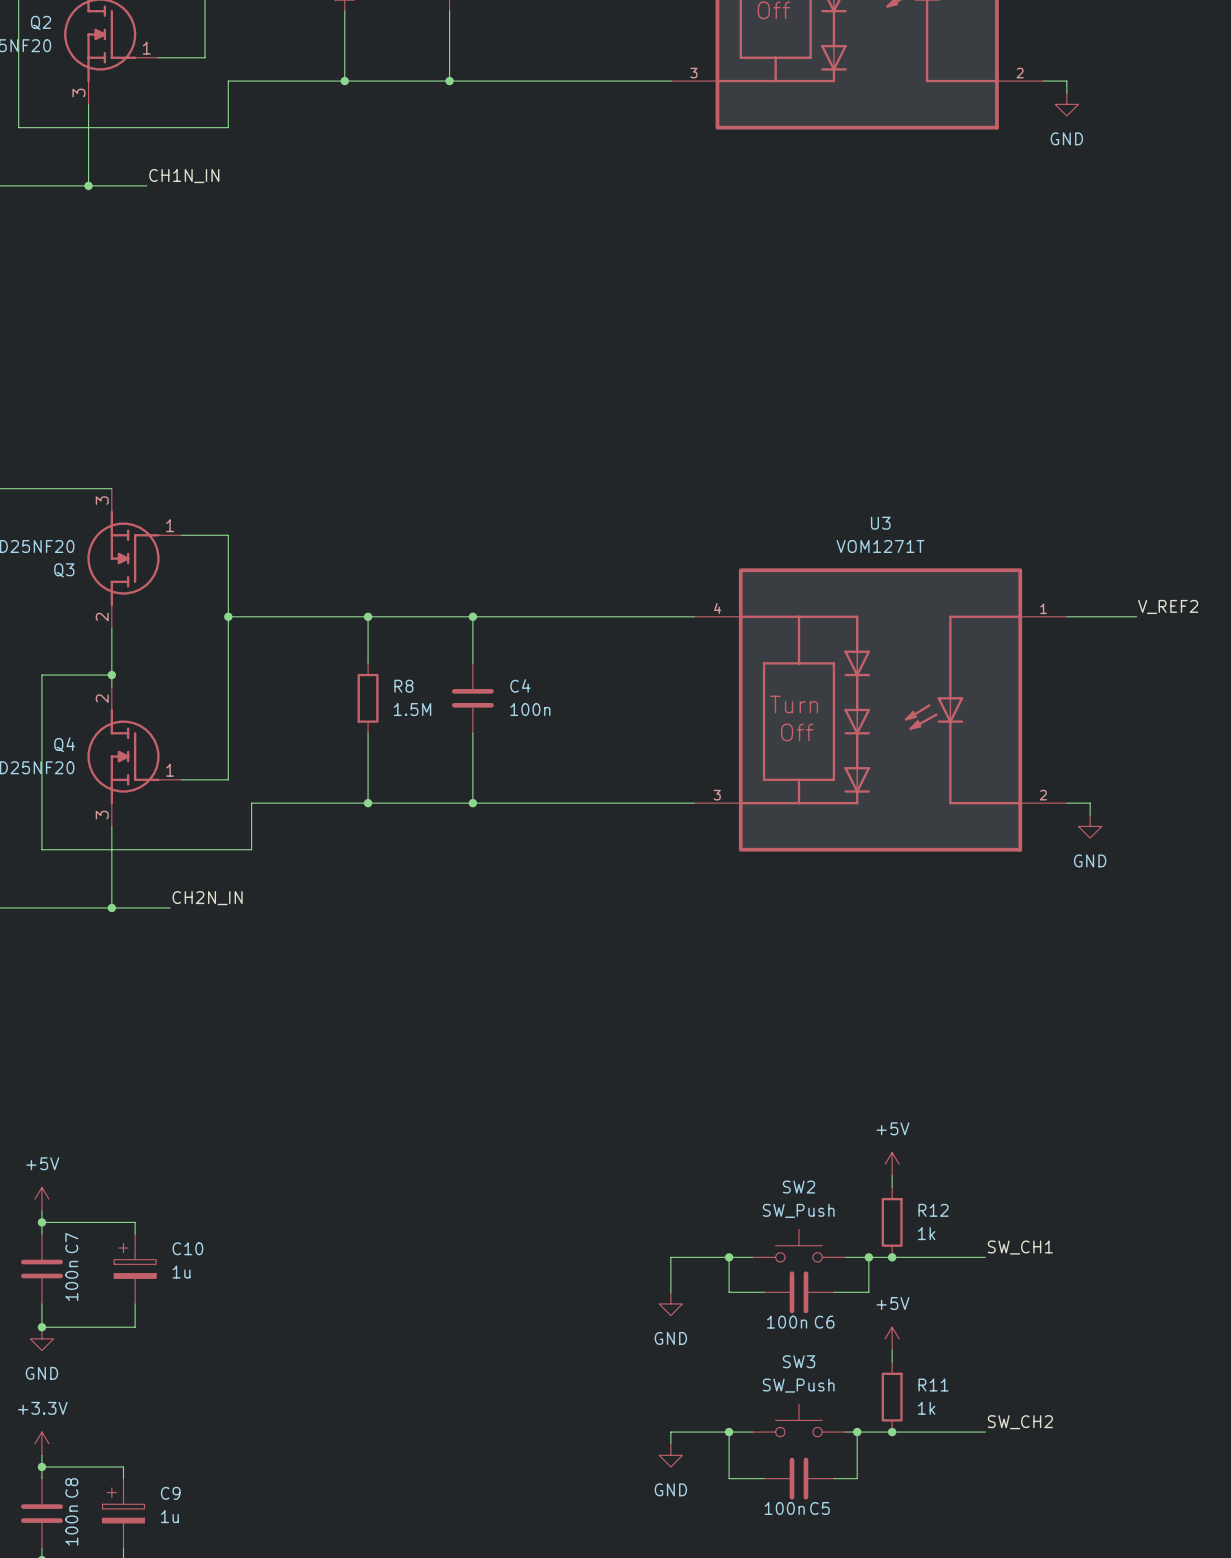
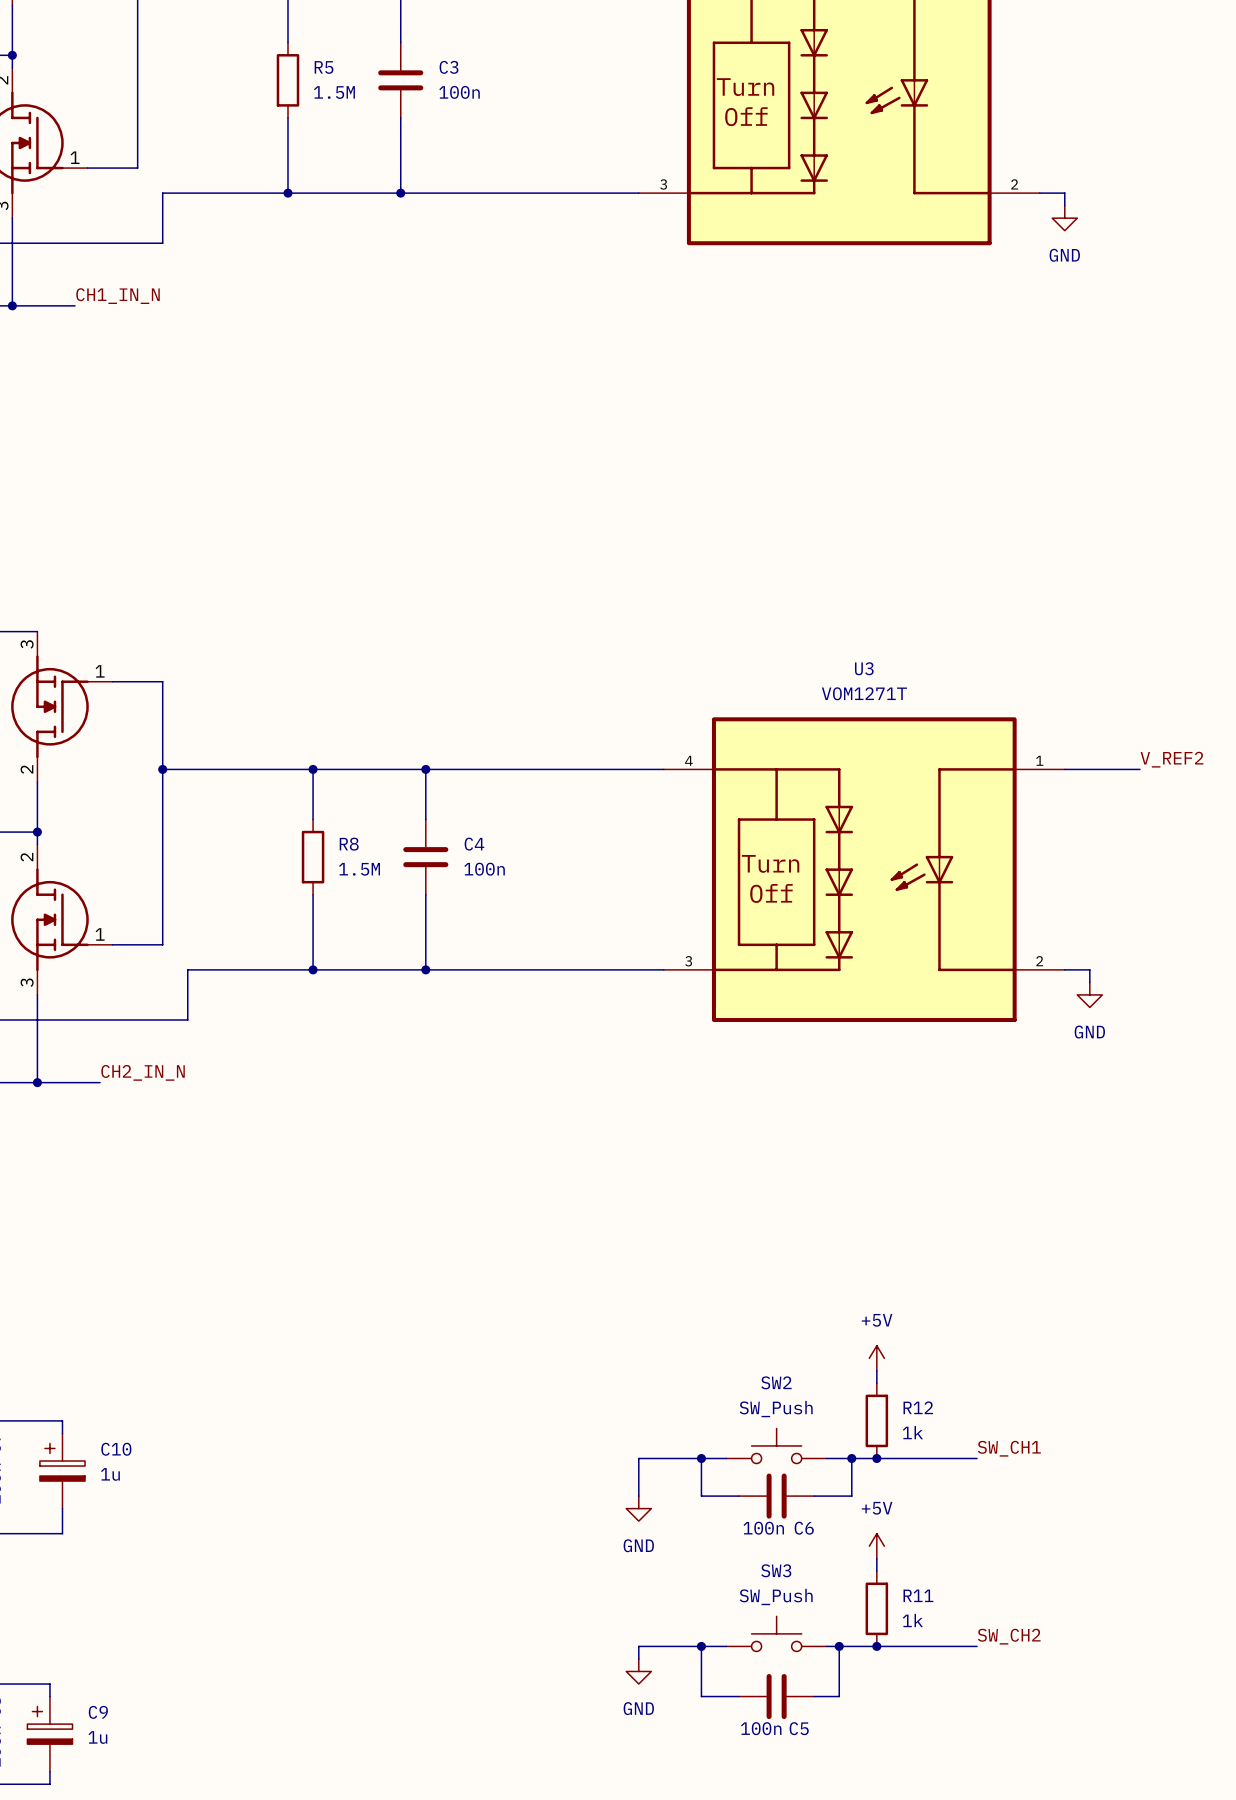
label: CH1N_IN (184, 176) -> CH1_IN_N (118, 296)
label: CH2N_IN (207, 898) -> CH2_IN_N (143, 1072)

